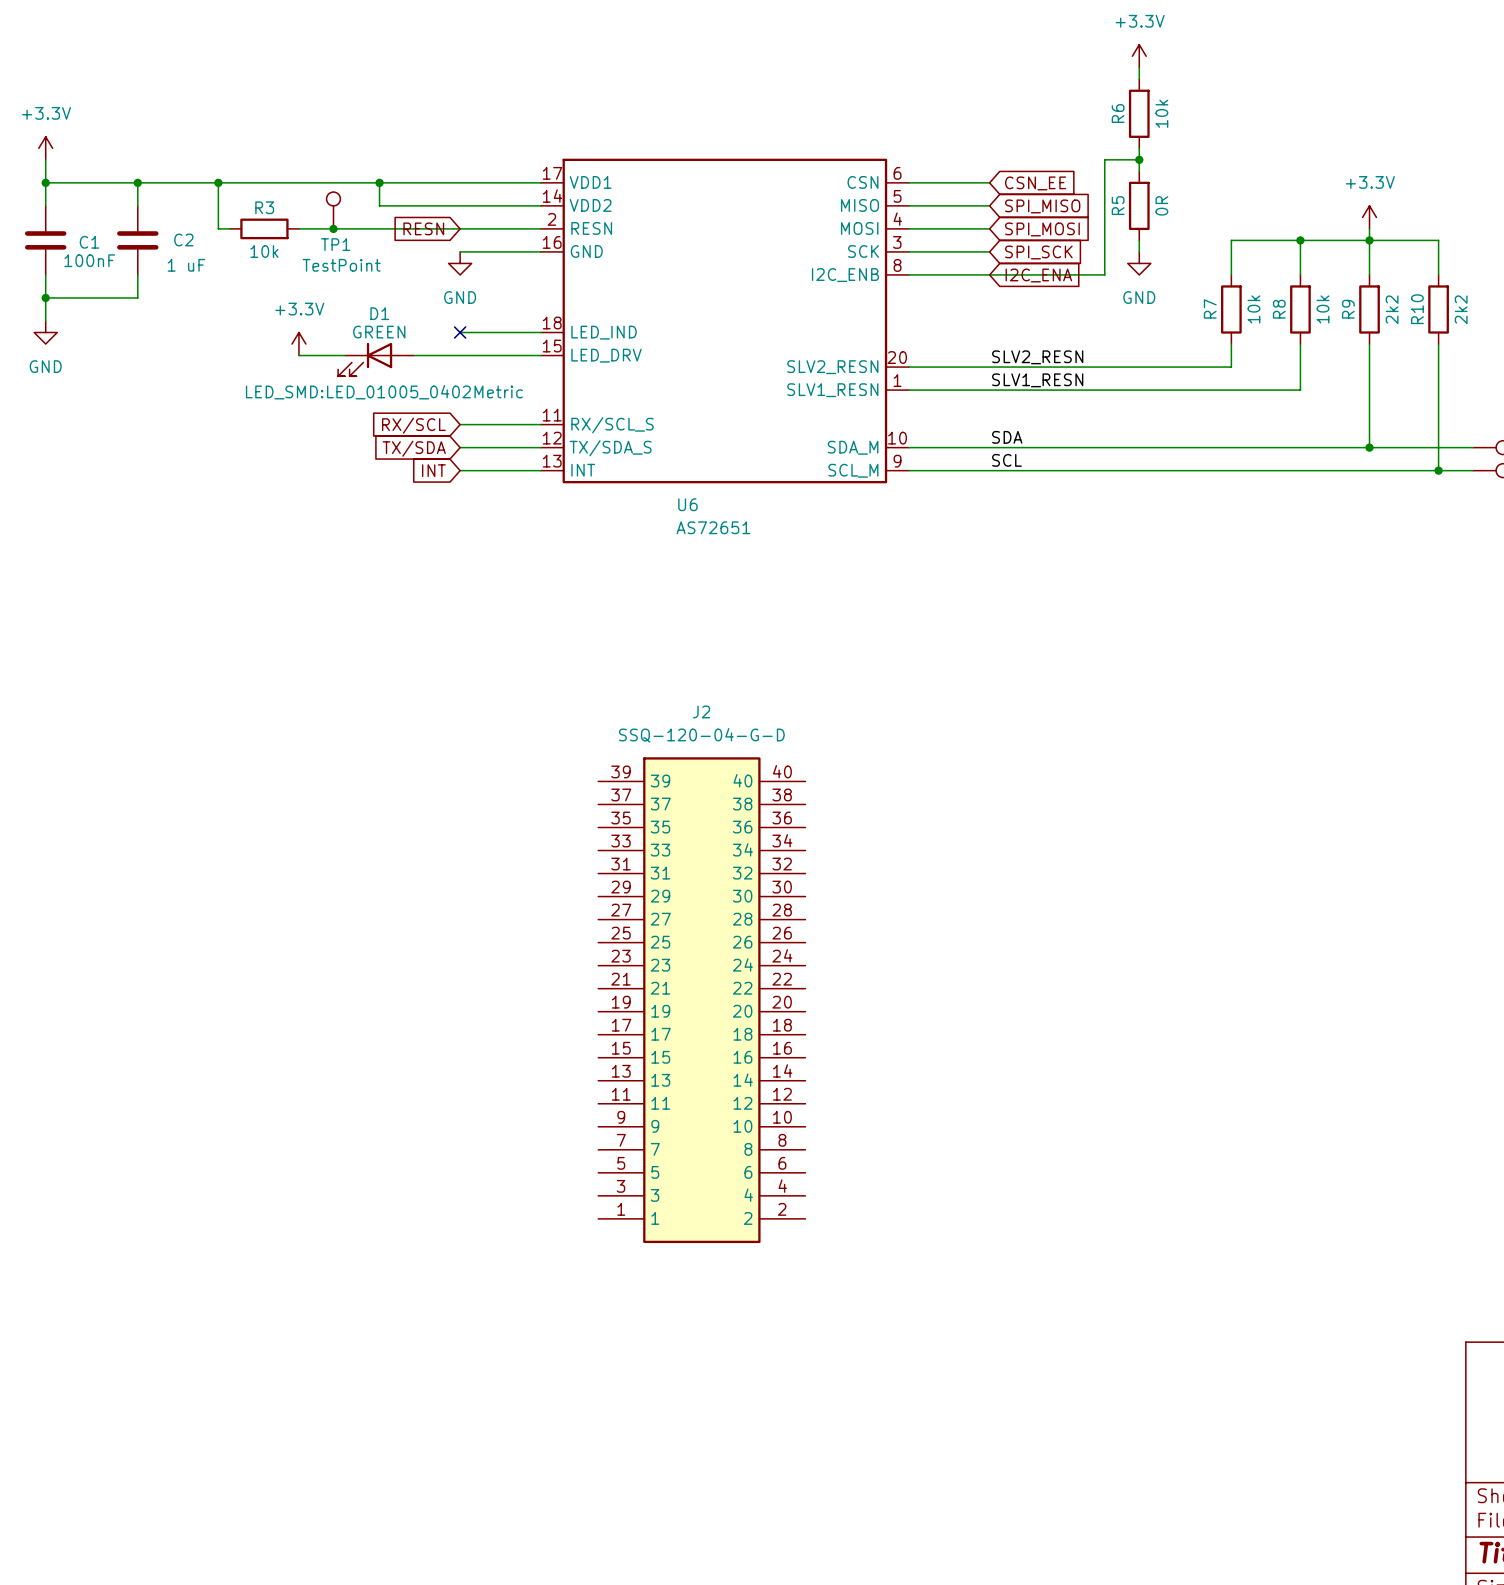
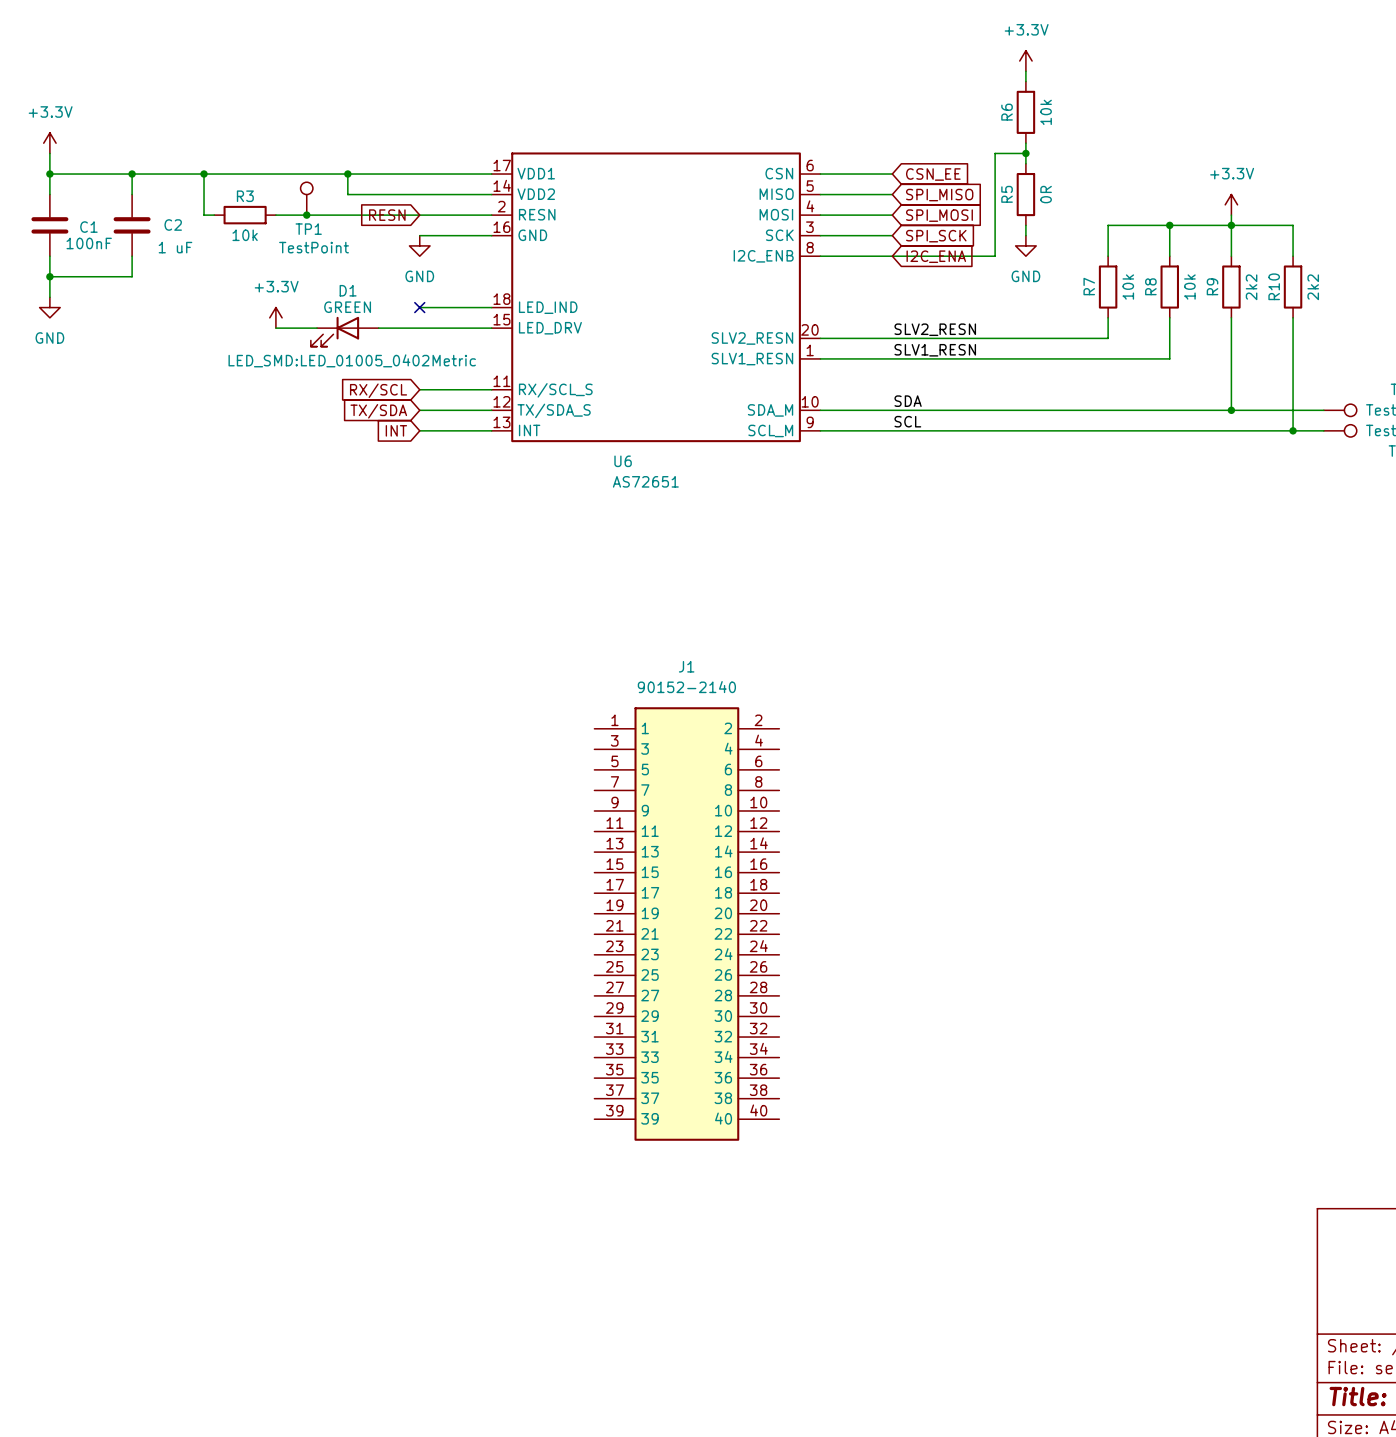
J2: SSQ-120-04-G-D (701, 1000) -> none
J1: none -> 90152-2140 (686, 924)

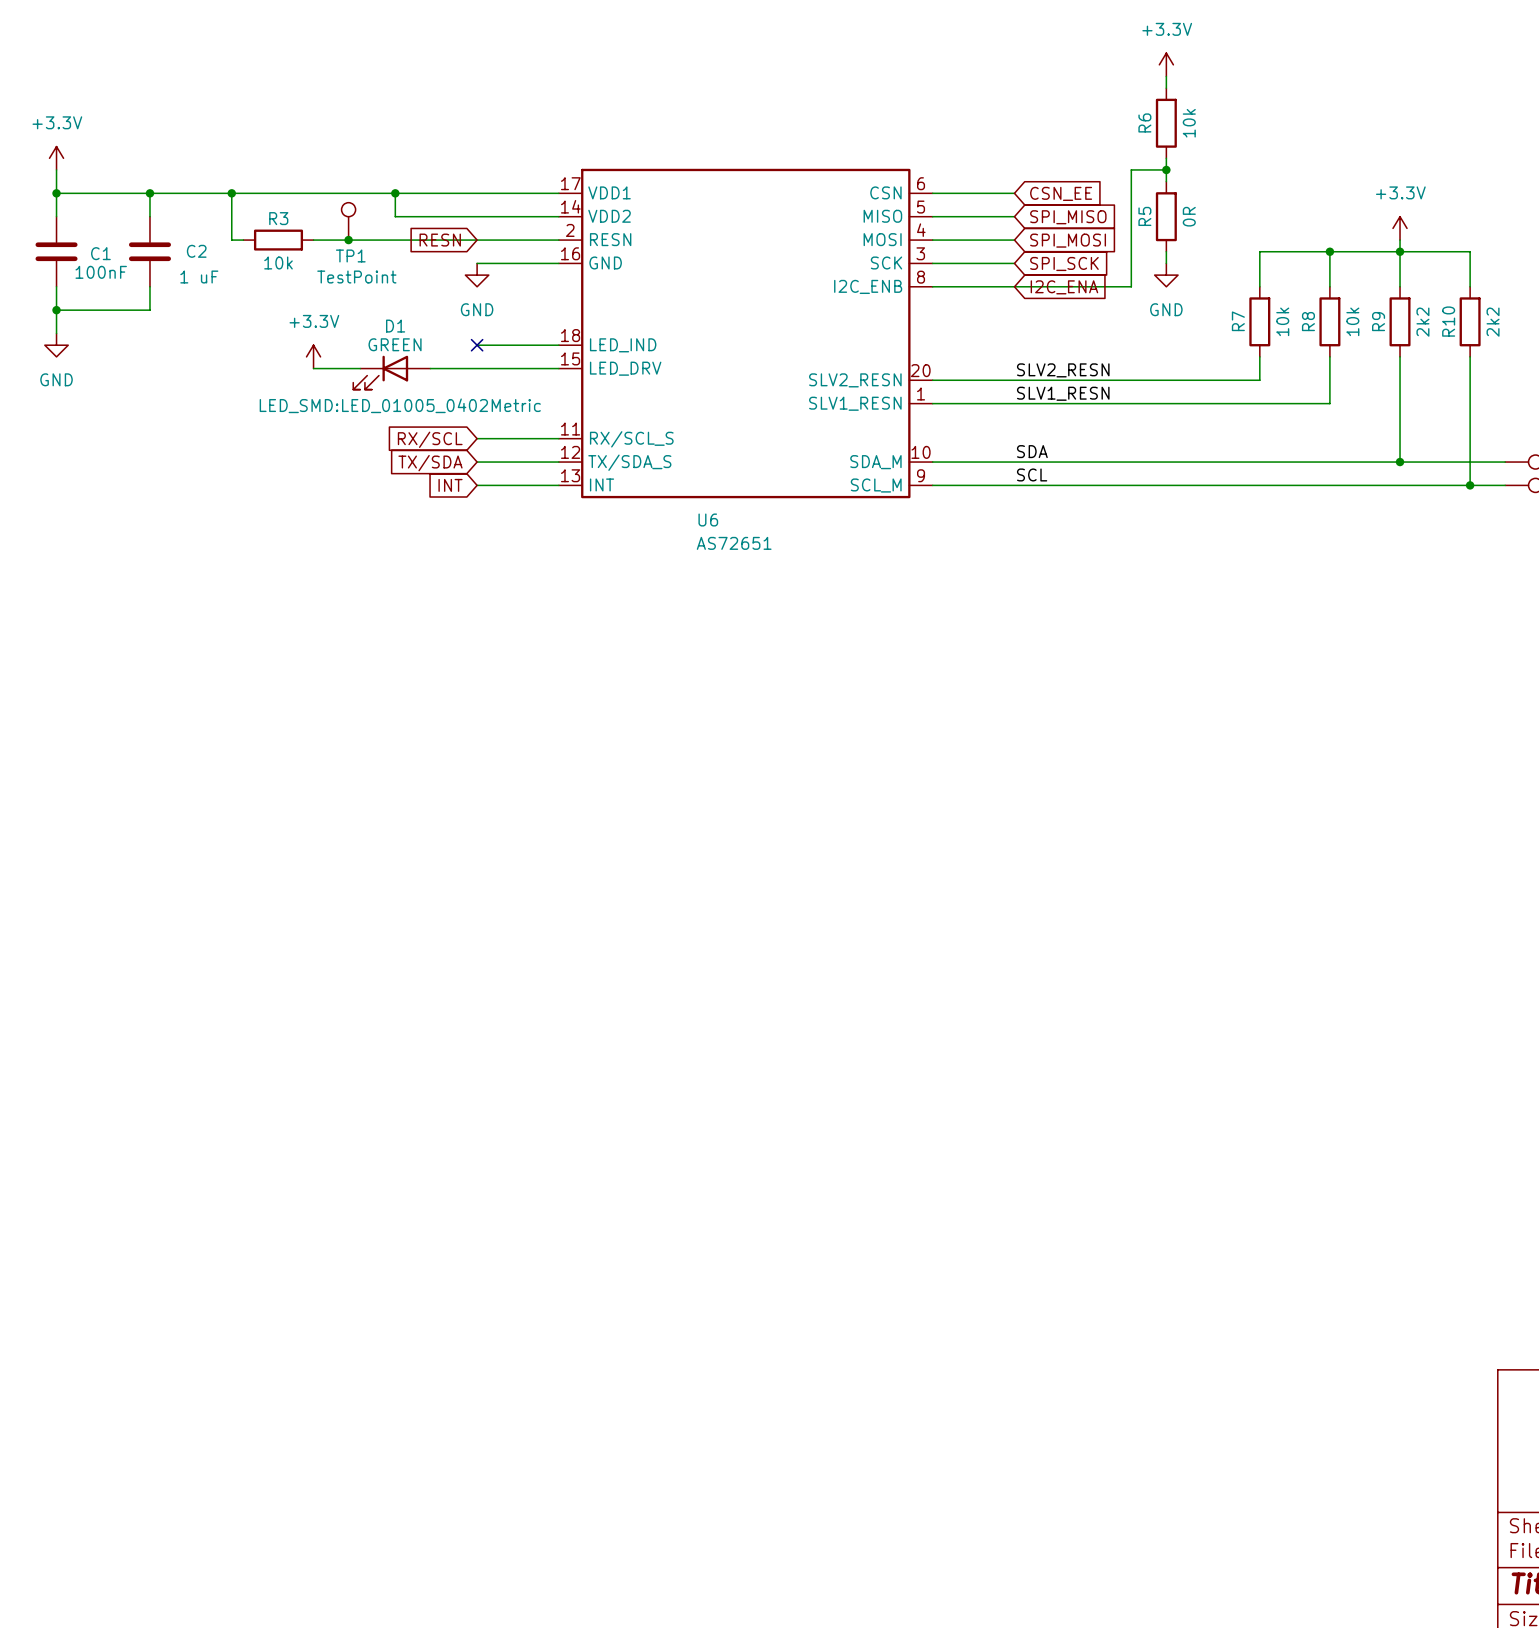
J1: 90152-2140 (686, 924) -> none

